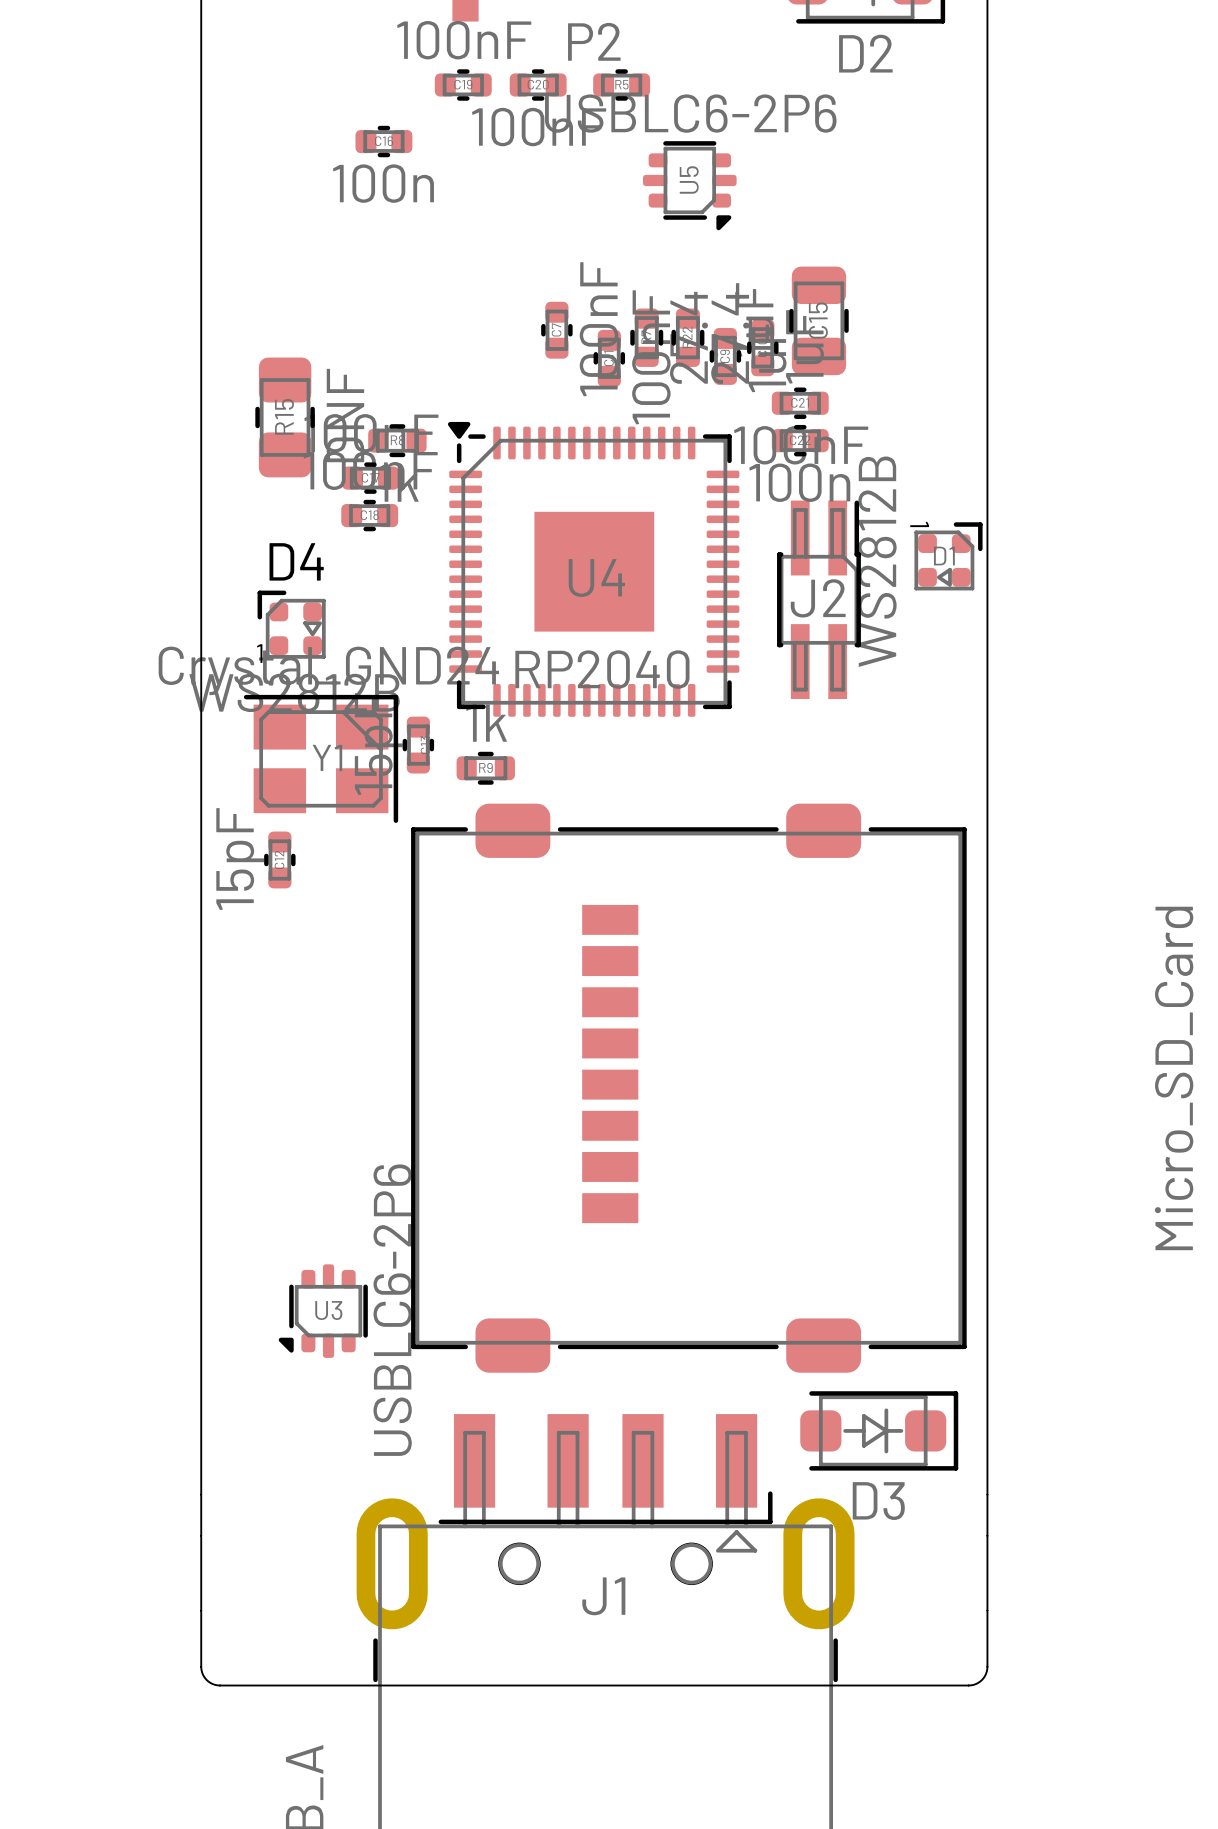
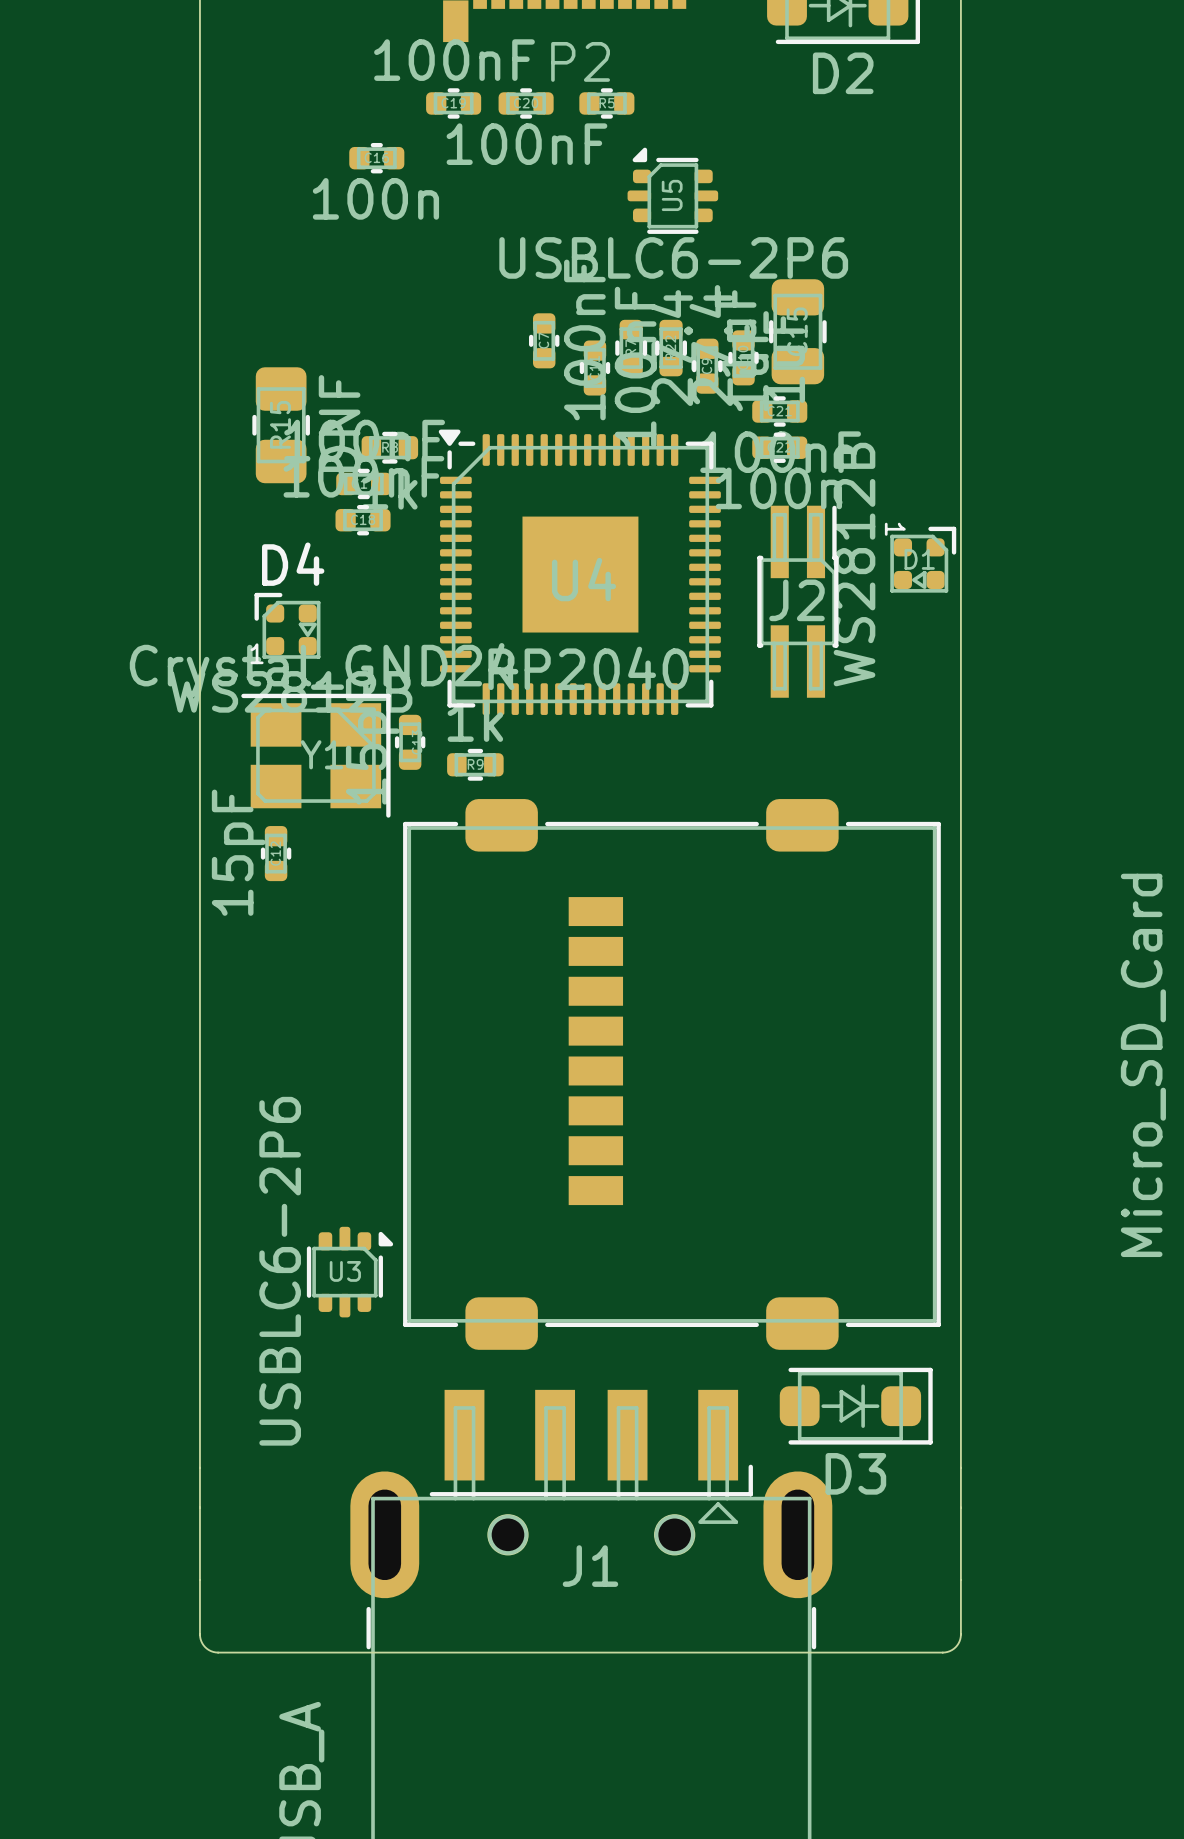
U5 rotation: 0° (689, 185) -> 180° (672, 190)
U3 rotation: 0° (323, 1311) -> 180° (349, 1272)

